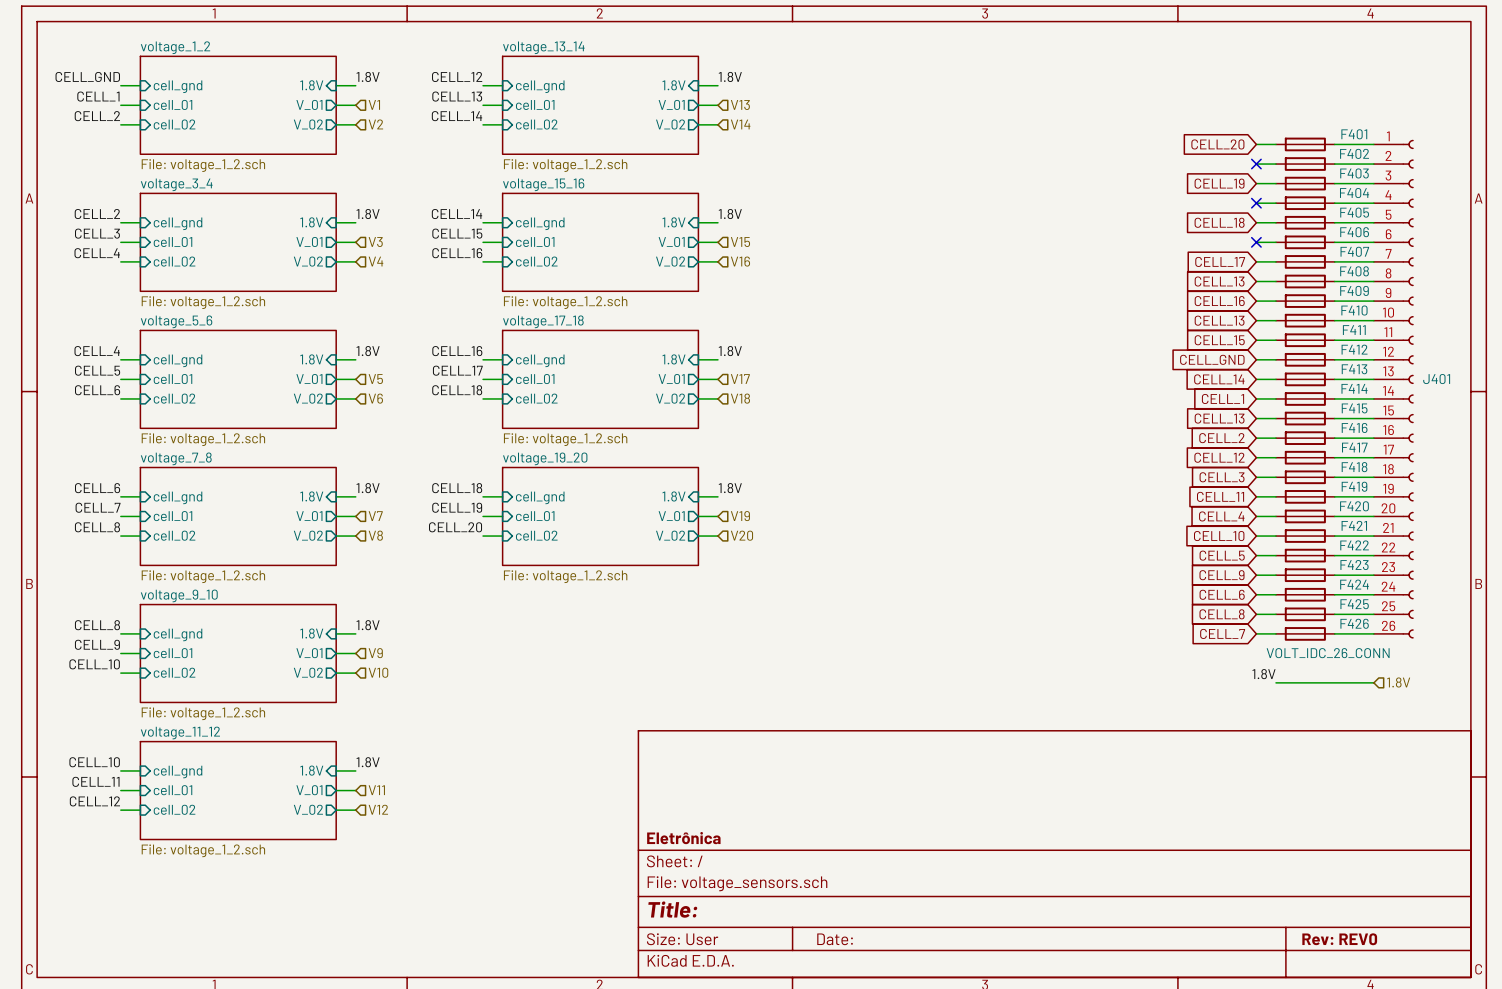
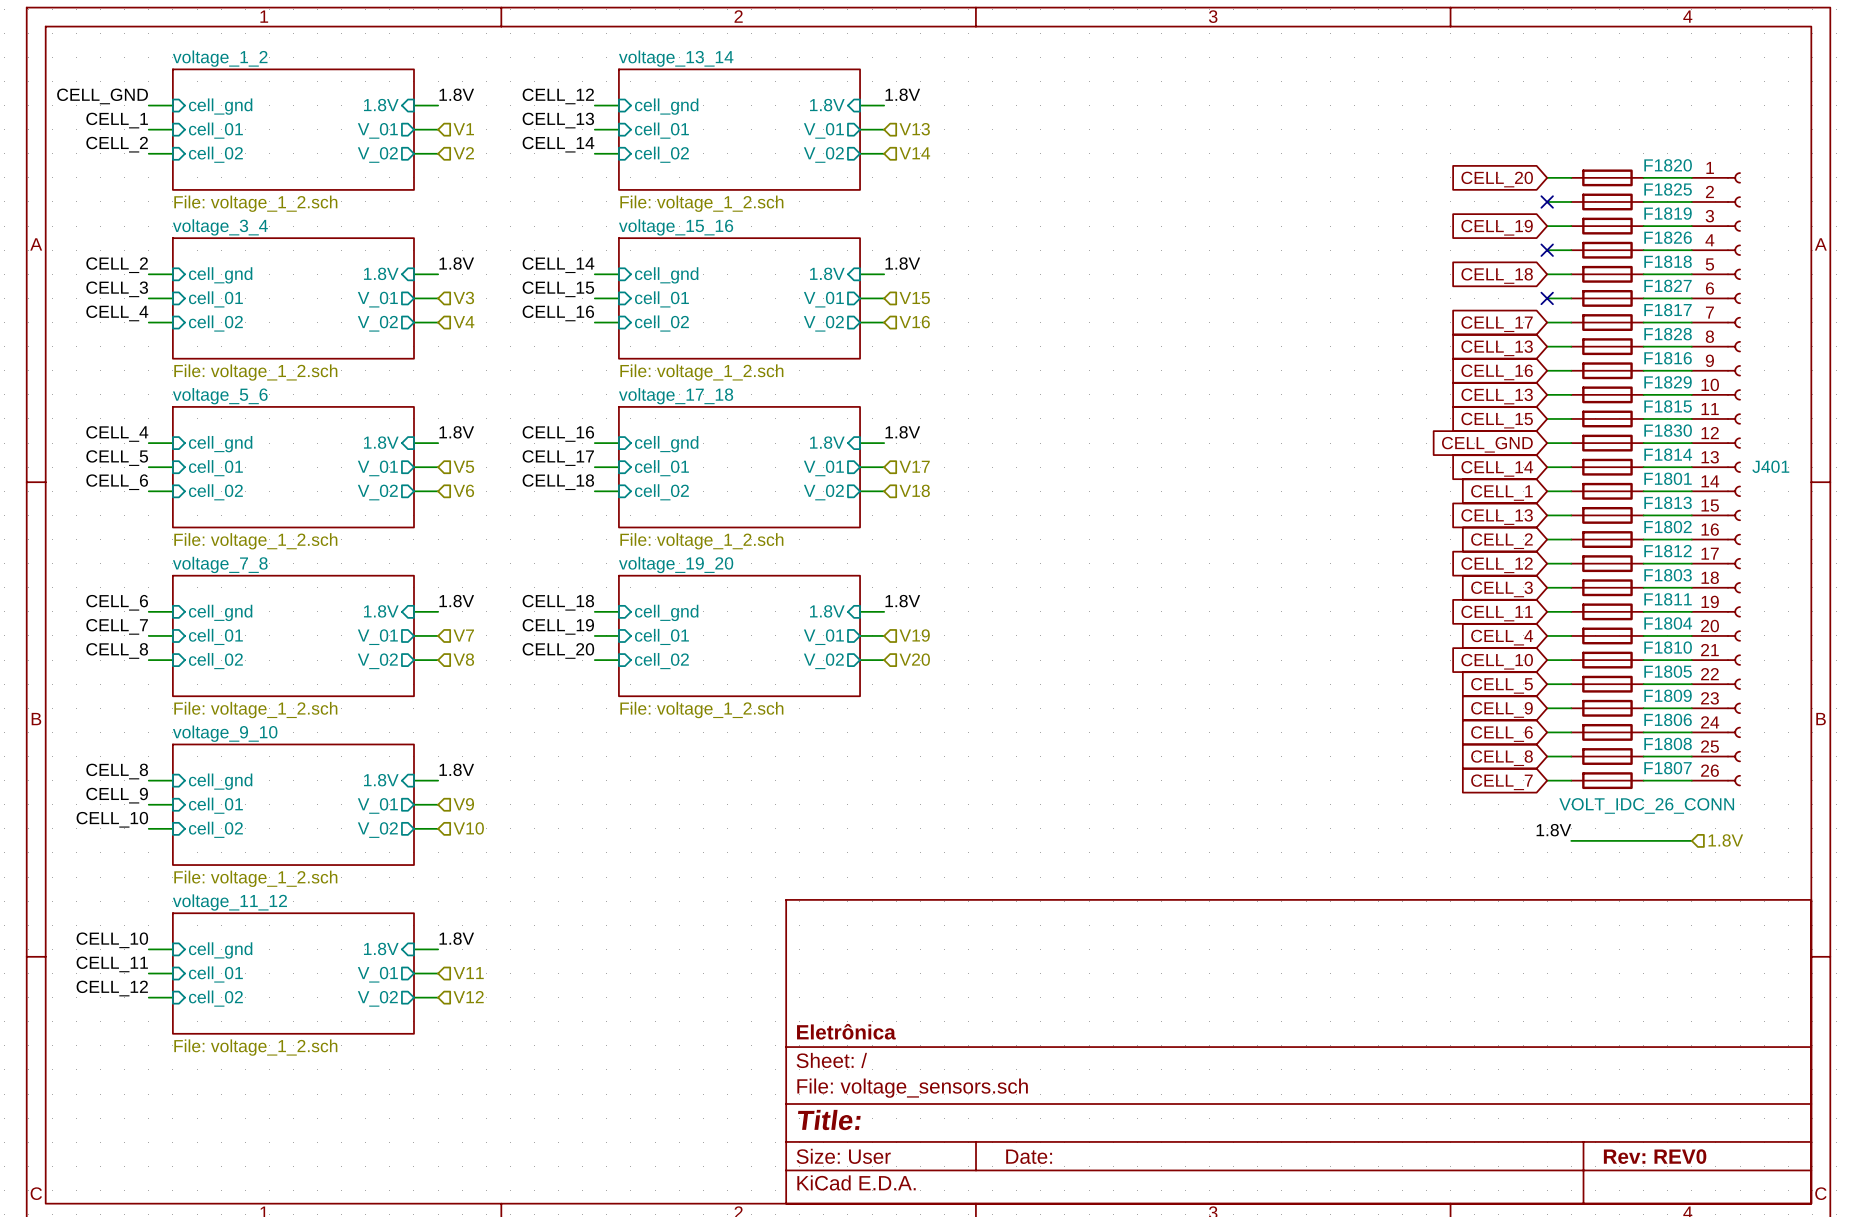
F401 name: F401 (1354, 134) -> F1820 (1668, 165)
F402 name: F402 (1354, 153) -> F1825 (1668, 189)
F403 name: F403 (1354, 173) -> F1819 (1668, 213)
F404 name: F404 (1354, 193) -> F1826 (1668, 237)
F405 name: F405 (1354, 212) -> F1818 (1668, 261)
F406 name: F406 (1354, 232) -> F1827 (1668, 285)
F407 name: F407 (1354, 251) -> F1817 (1668, 310)
F408 name: F408 (1354, 271) -> F1828 (1668, 334)
F409 name: F409 (1354, 290) -> F1816 (1668, 358)
F410 name: F410 (1354, 310) -> F1829 (1668, 382)
F411 name: F411 (1354, 330) -> F1815 (1668, 406)
F412 name: F412 (1354, 349) -> F1830 (1668, 430)
F413 name: F413 (1354, 369) -> F1814 (1668, 454)
F414 name: F414 (1354, 388) -> F1801 (1668, 478)
F415 name: F415 (1354, 408) -> F1813 (1668, 502)
F416 name: F416 (1354, 427) -> F1802 (1668, 527)
F417 name: F417 (1354, 447) -> F1812 (1668, 551)
F418 name: F418 (1354, 467) -> F1803 (1668, 575)
F419 name: F419 (1354, 486) -> F1811 (1668, 599)
F420 name: F420 (1354, 506) -> F1804 (1668, 623)
F421 name: F421 (1354, 525) -> F1810 (1668, 647)
F422 name: F422 (1354, 545) -> F1805 (1668, 671)
F423 name: F423 (1354, 565) -> F1809 (1668, 695)
F424 name: F424 (1354, 584) -> F1806 (1668, 719)
F425 name: F425 (1354, 604) -> F1808 (1668, 744)
F426 name: F426 (1354, 623) -> F1807 (1668, 768)

